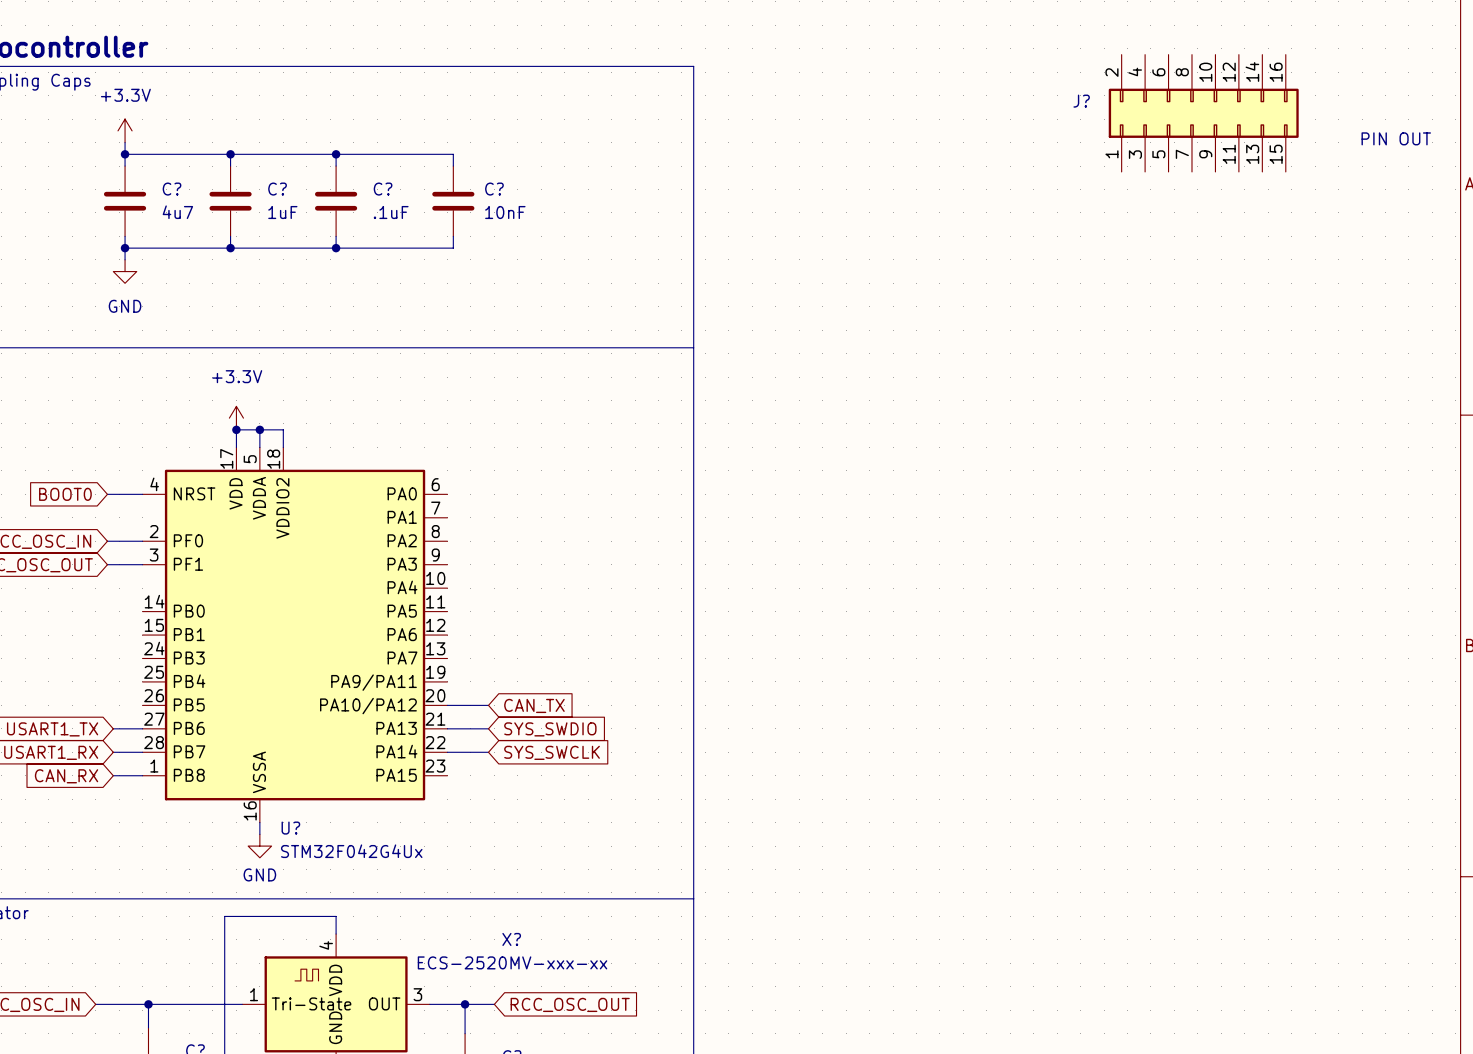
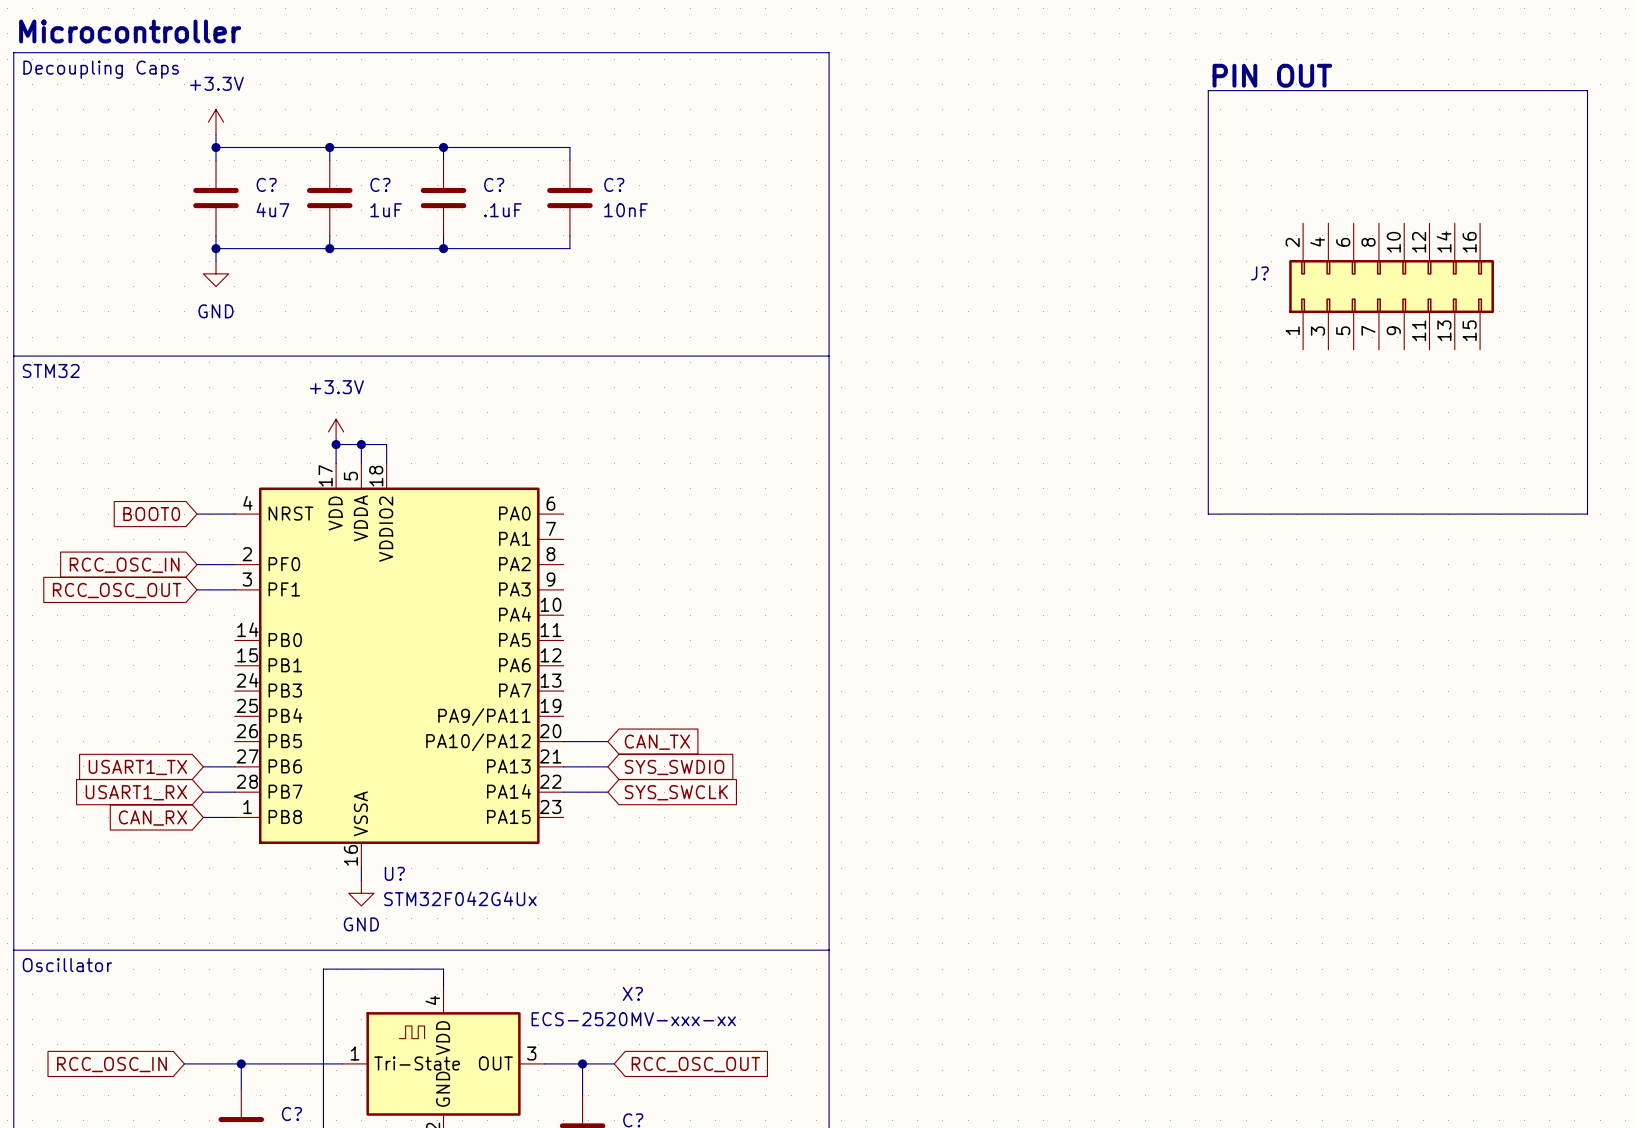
text: none -> PIN OUT (1272, 75)
line: none -> (1208, 90) (1587, 90) (1587, 514) (1208, 514) (1208, 90)
J? position: (1203, 113) -> (1391, 286)
text: PIN OUT (1396, 138) -> none

